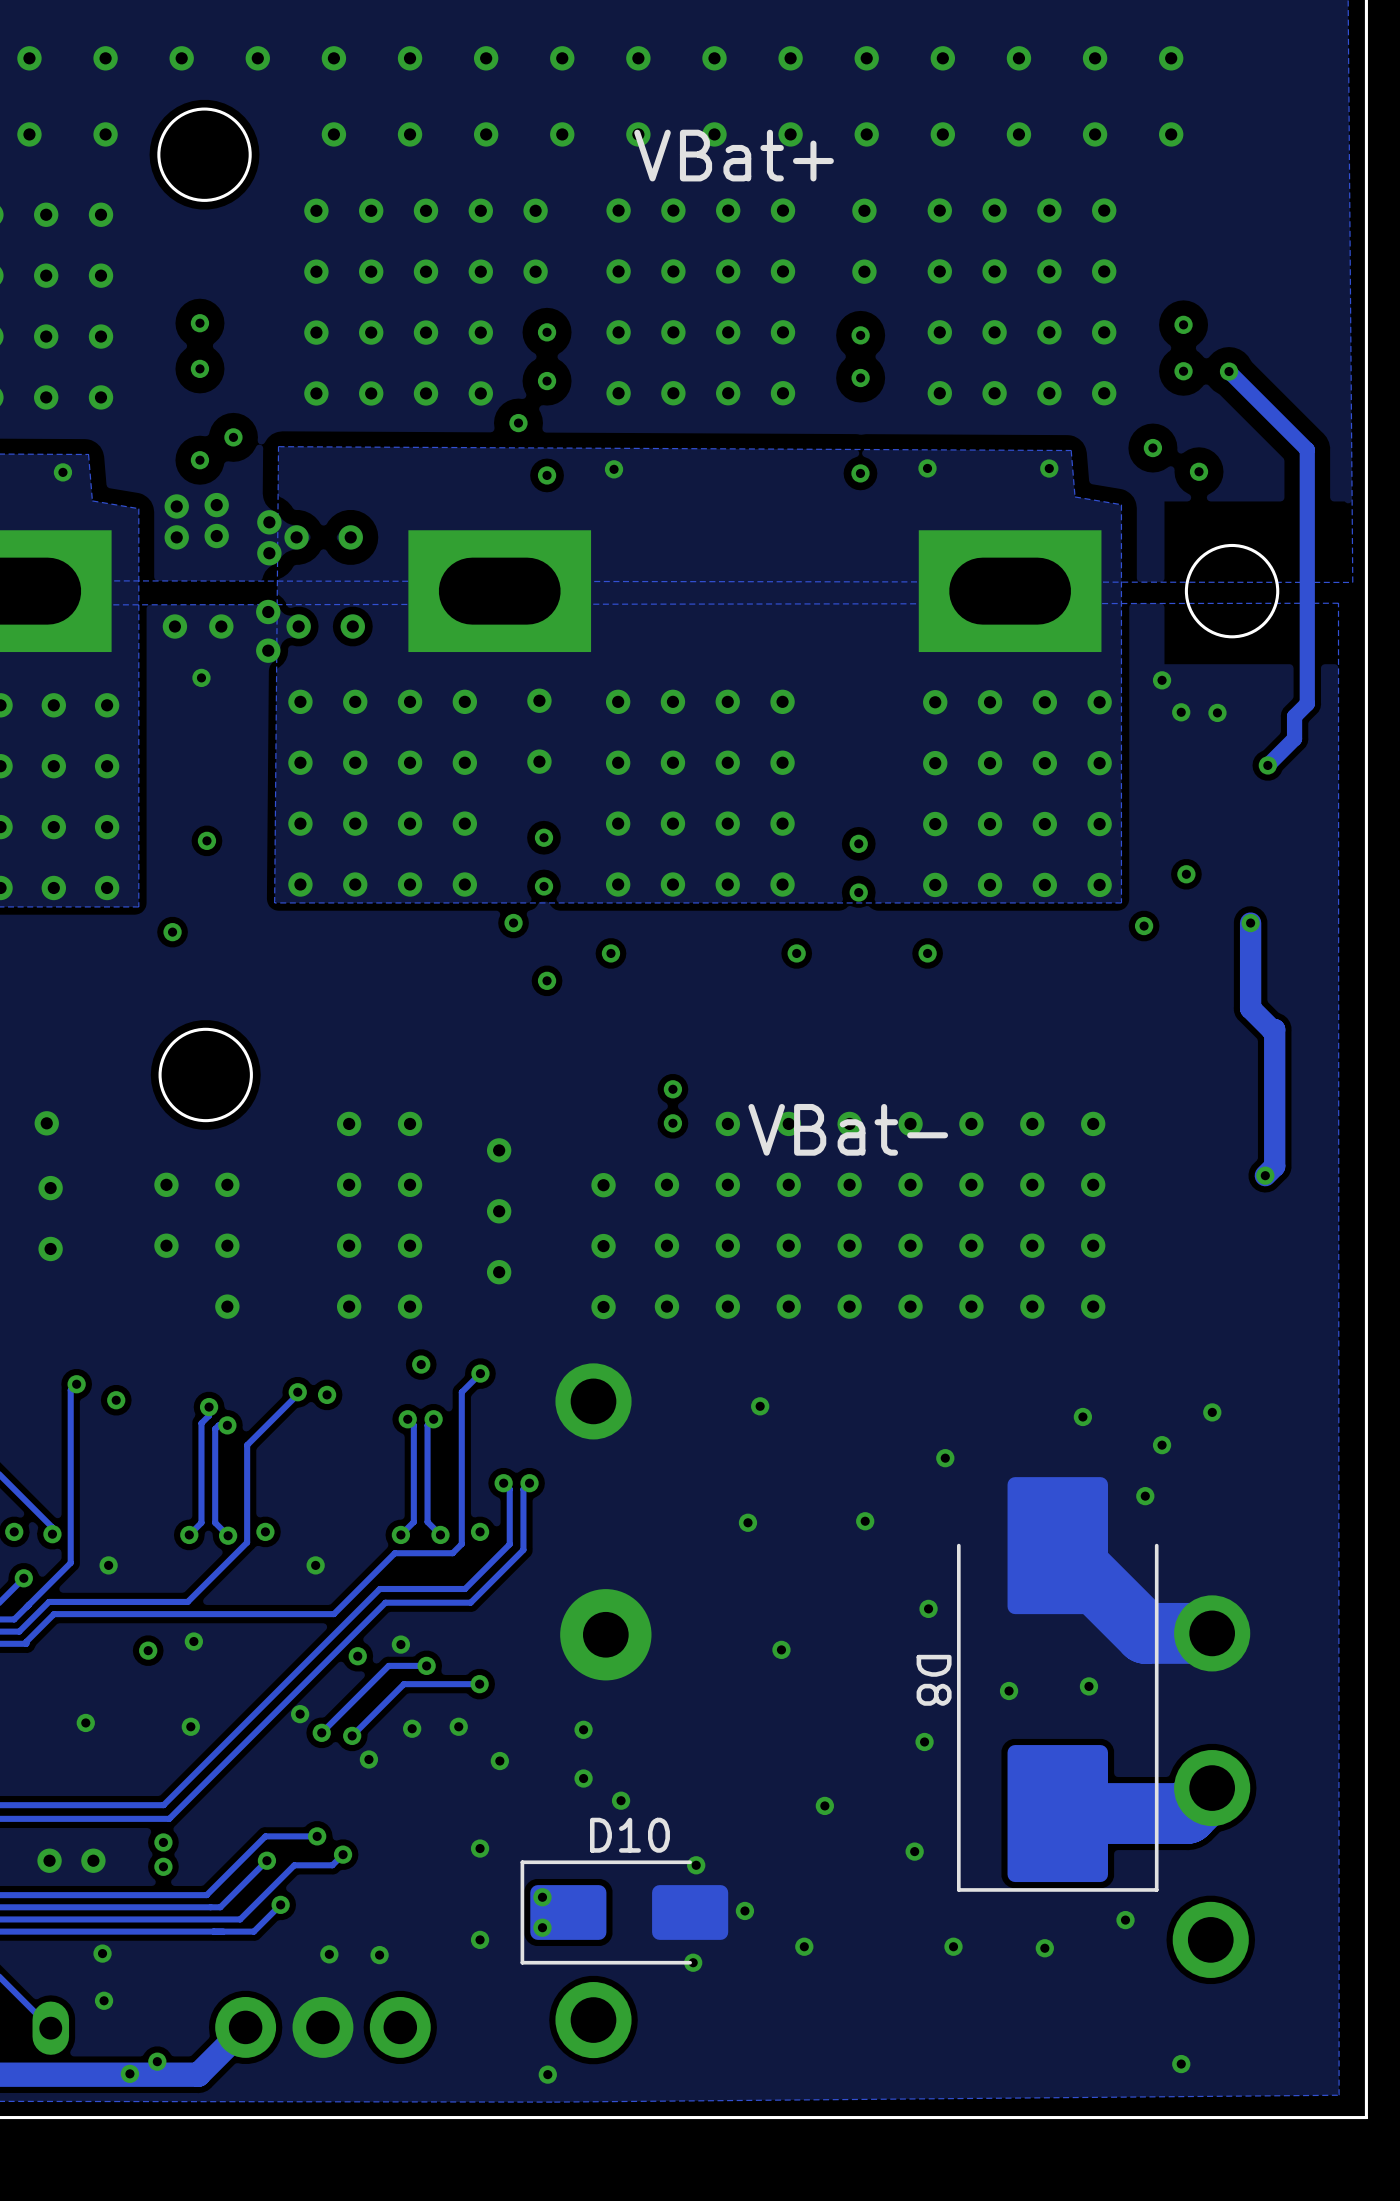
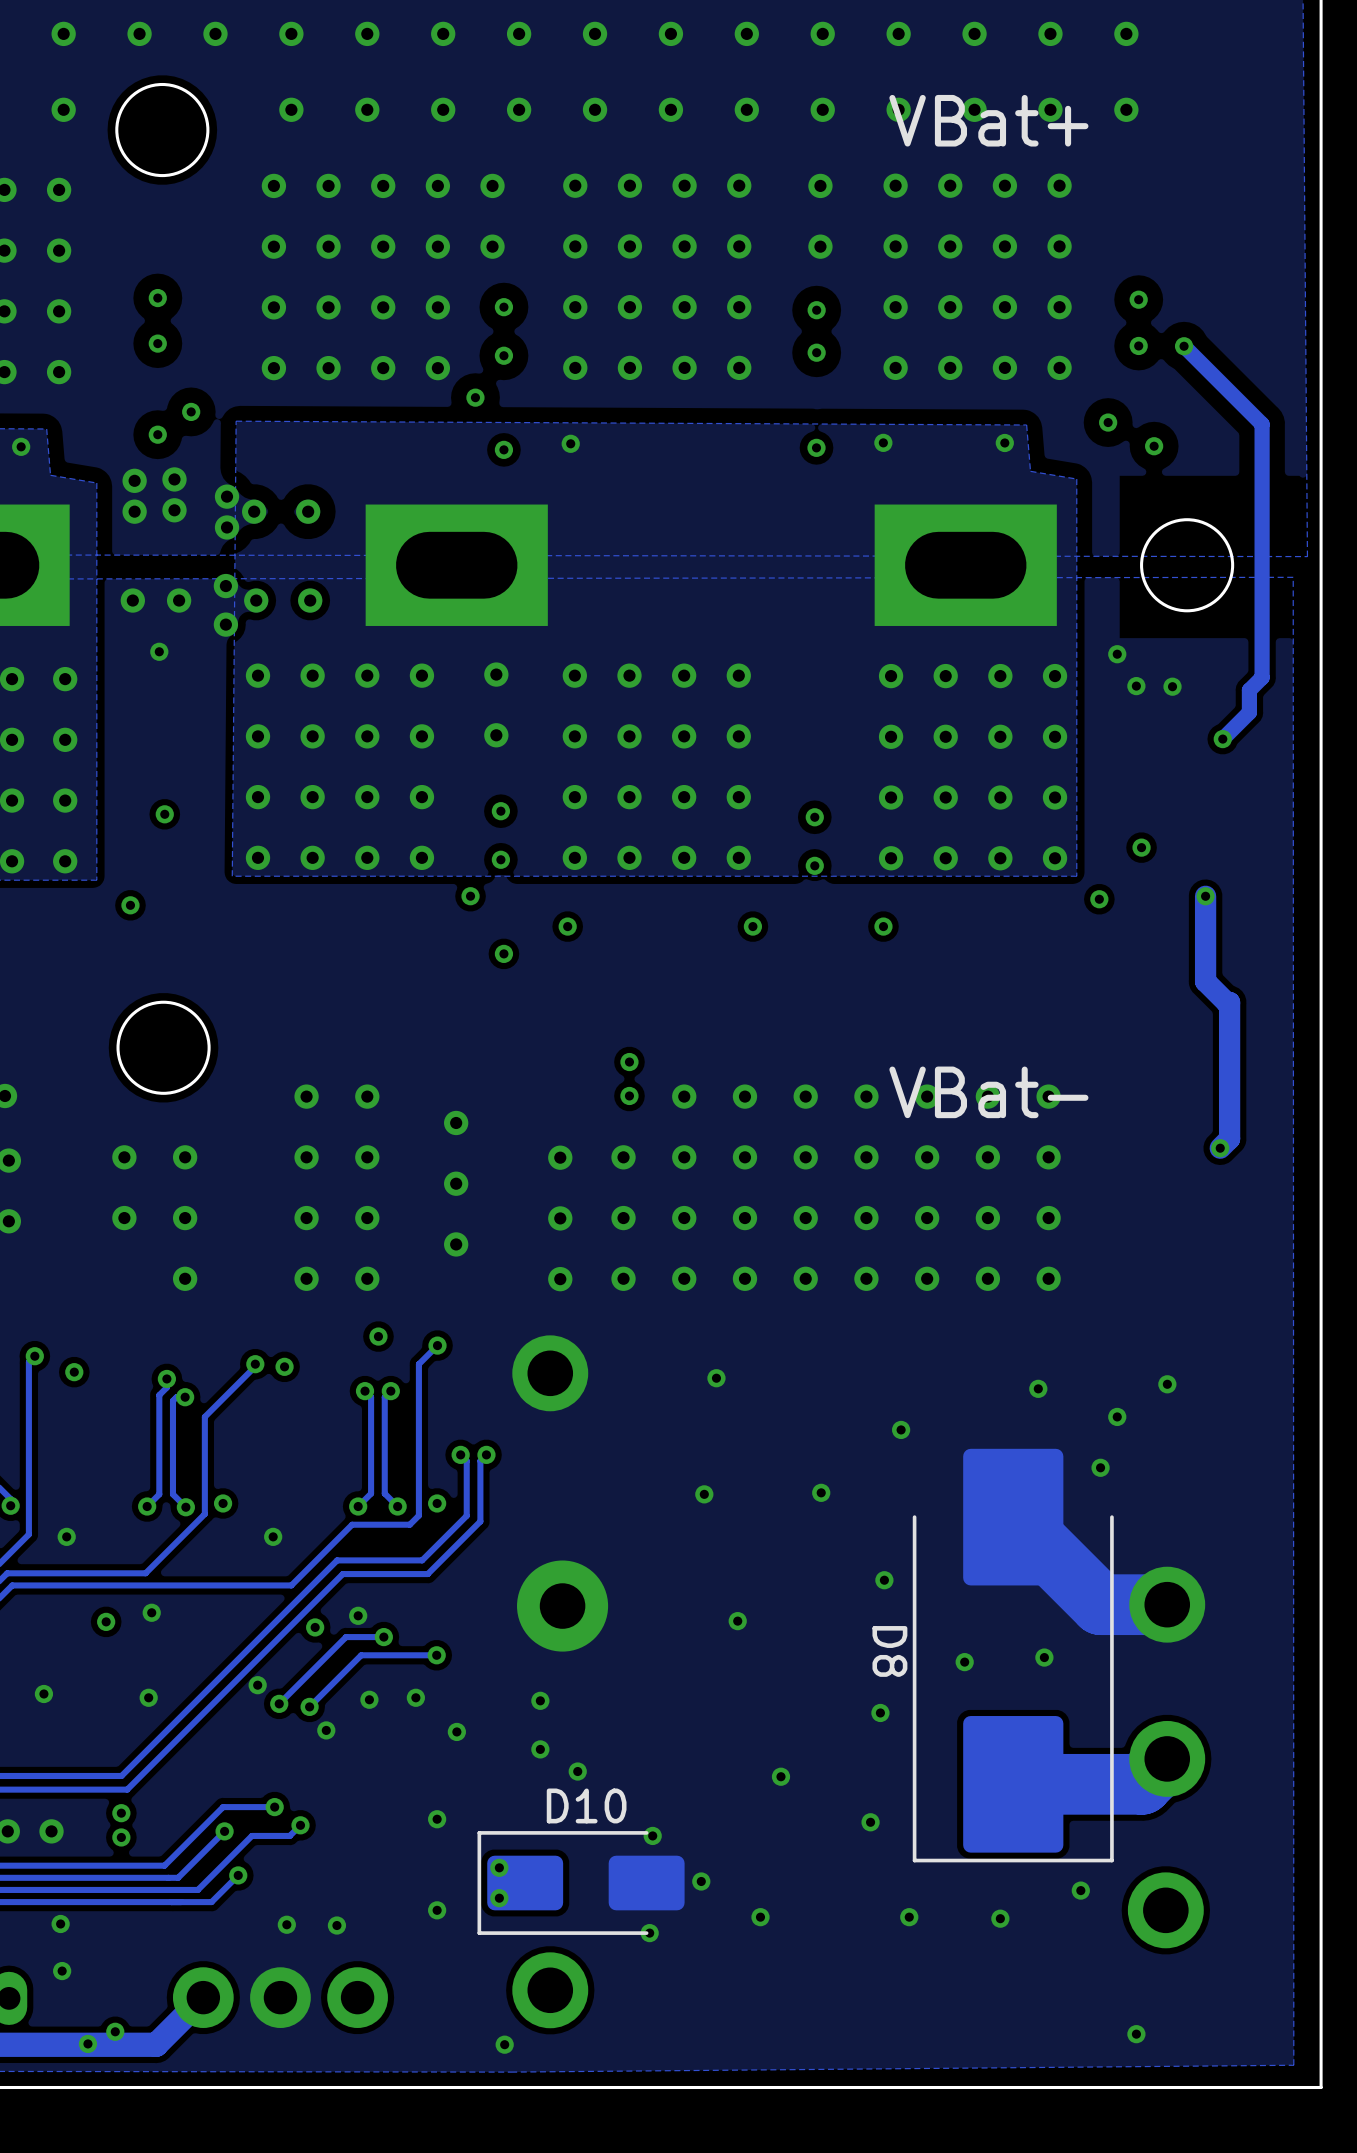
text position: VBat+ (734, 155) -> VBat+ (988, 120)
text position: VBat- (848, 1129) -> VBat- (988, 1092)

